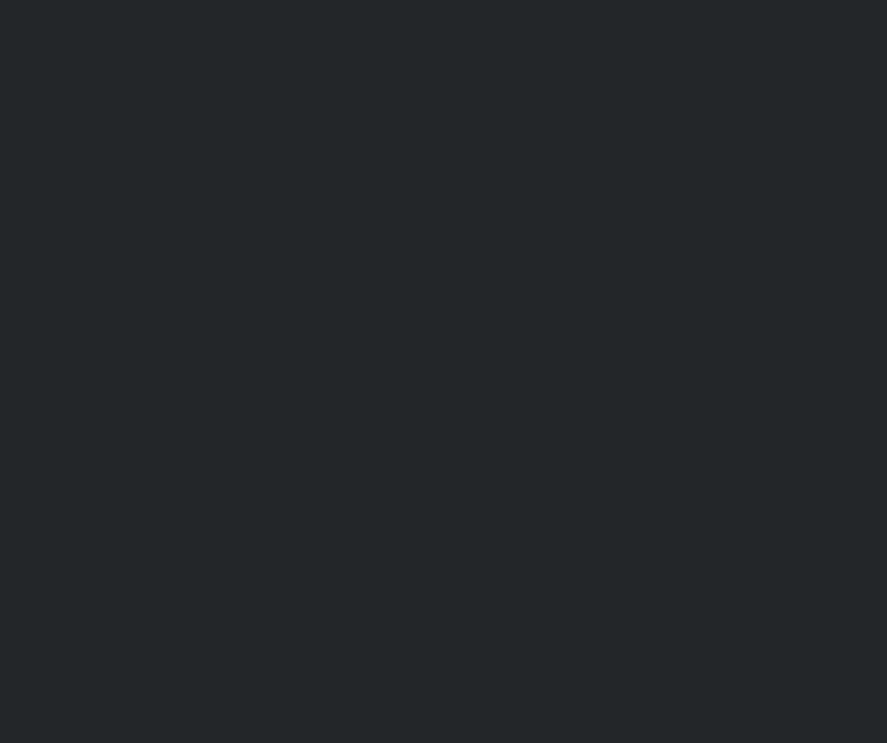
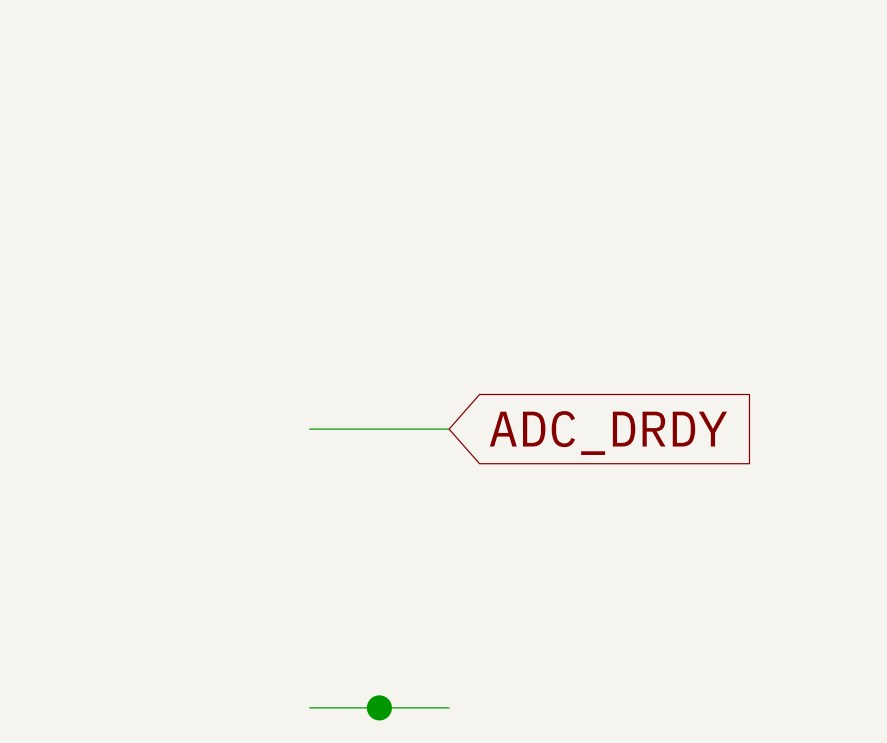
wire: none -> (309, 429) (449, 429)
global label: none -> ADC_DRDY (608, 433)
wire: none -> (309, 707) (449, 707)
junction: none -> (379, 707)

